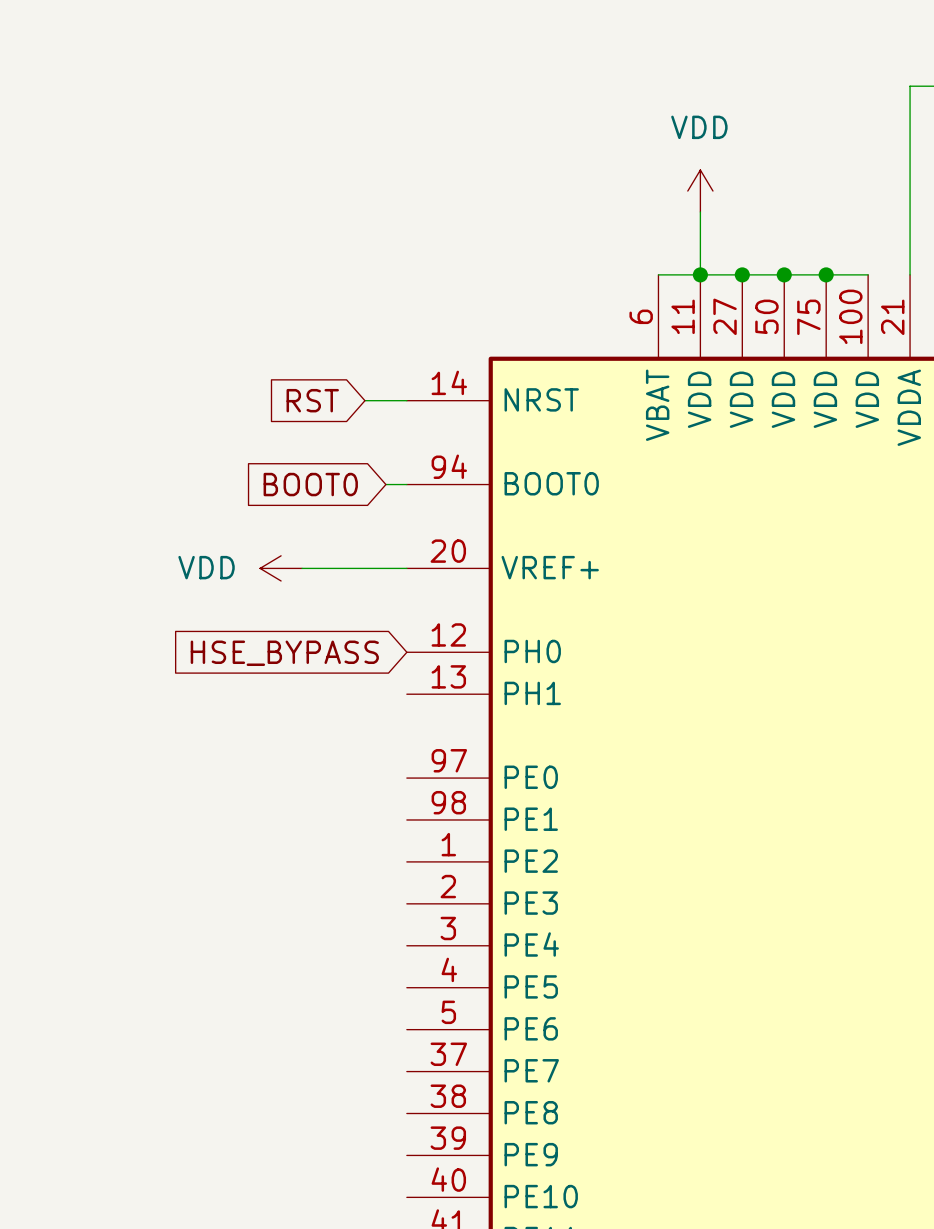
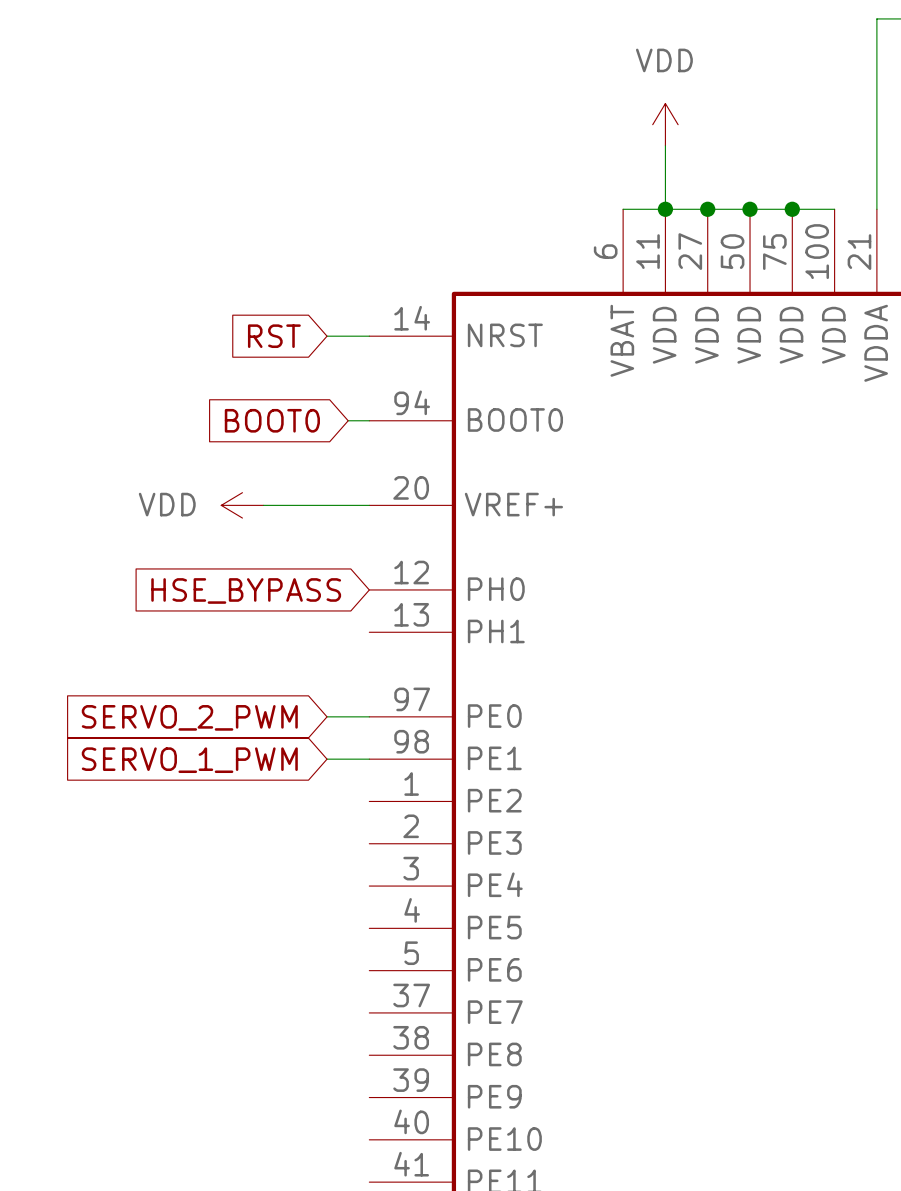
wire: none -> (327, 716) (369, 716)
global label: none -> SERVO_2_PWM (189, 717)
wire: none -> (327, 759) (369, 759)
global label: none -> SERVO_1_PWM (189, 760)

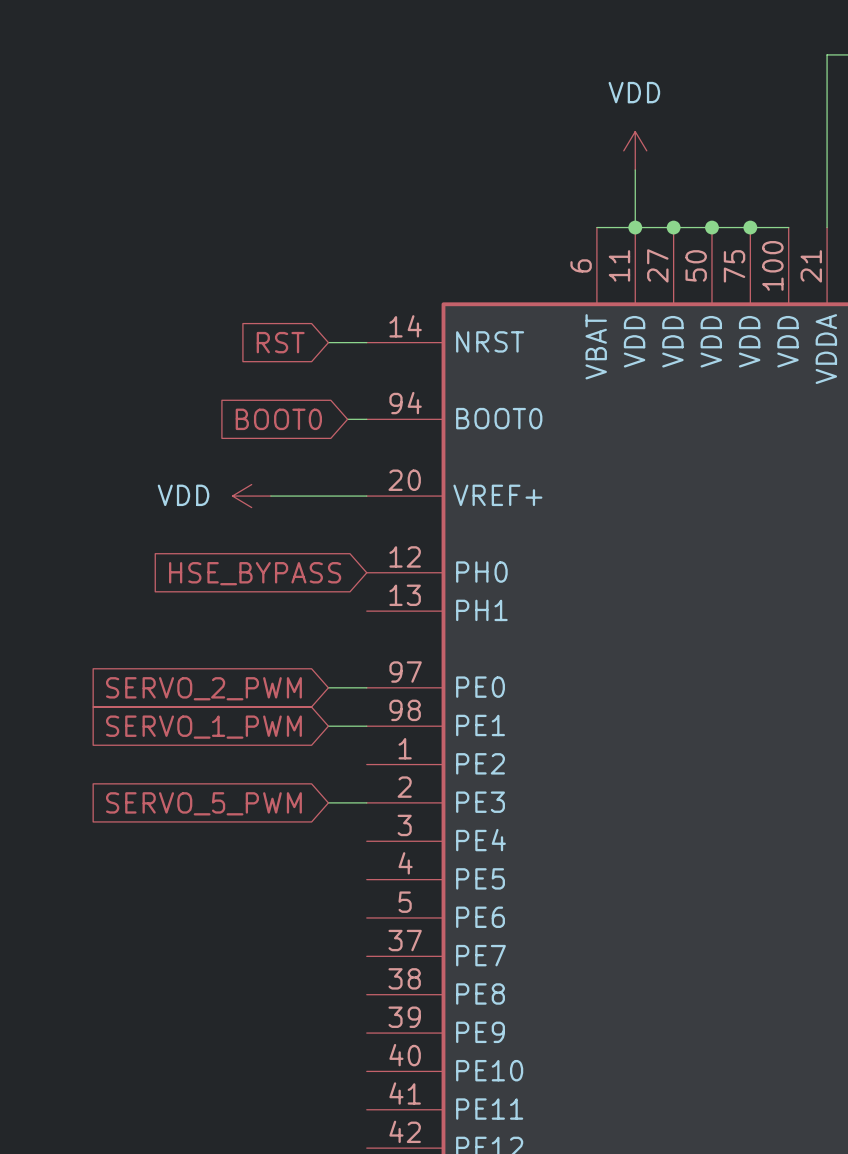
wire: none -> (328, 802) (366, 802)
global label: none -> SERVO_5_PWM (203, 803)

